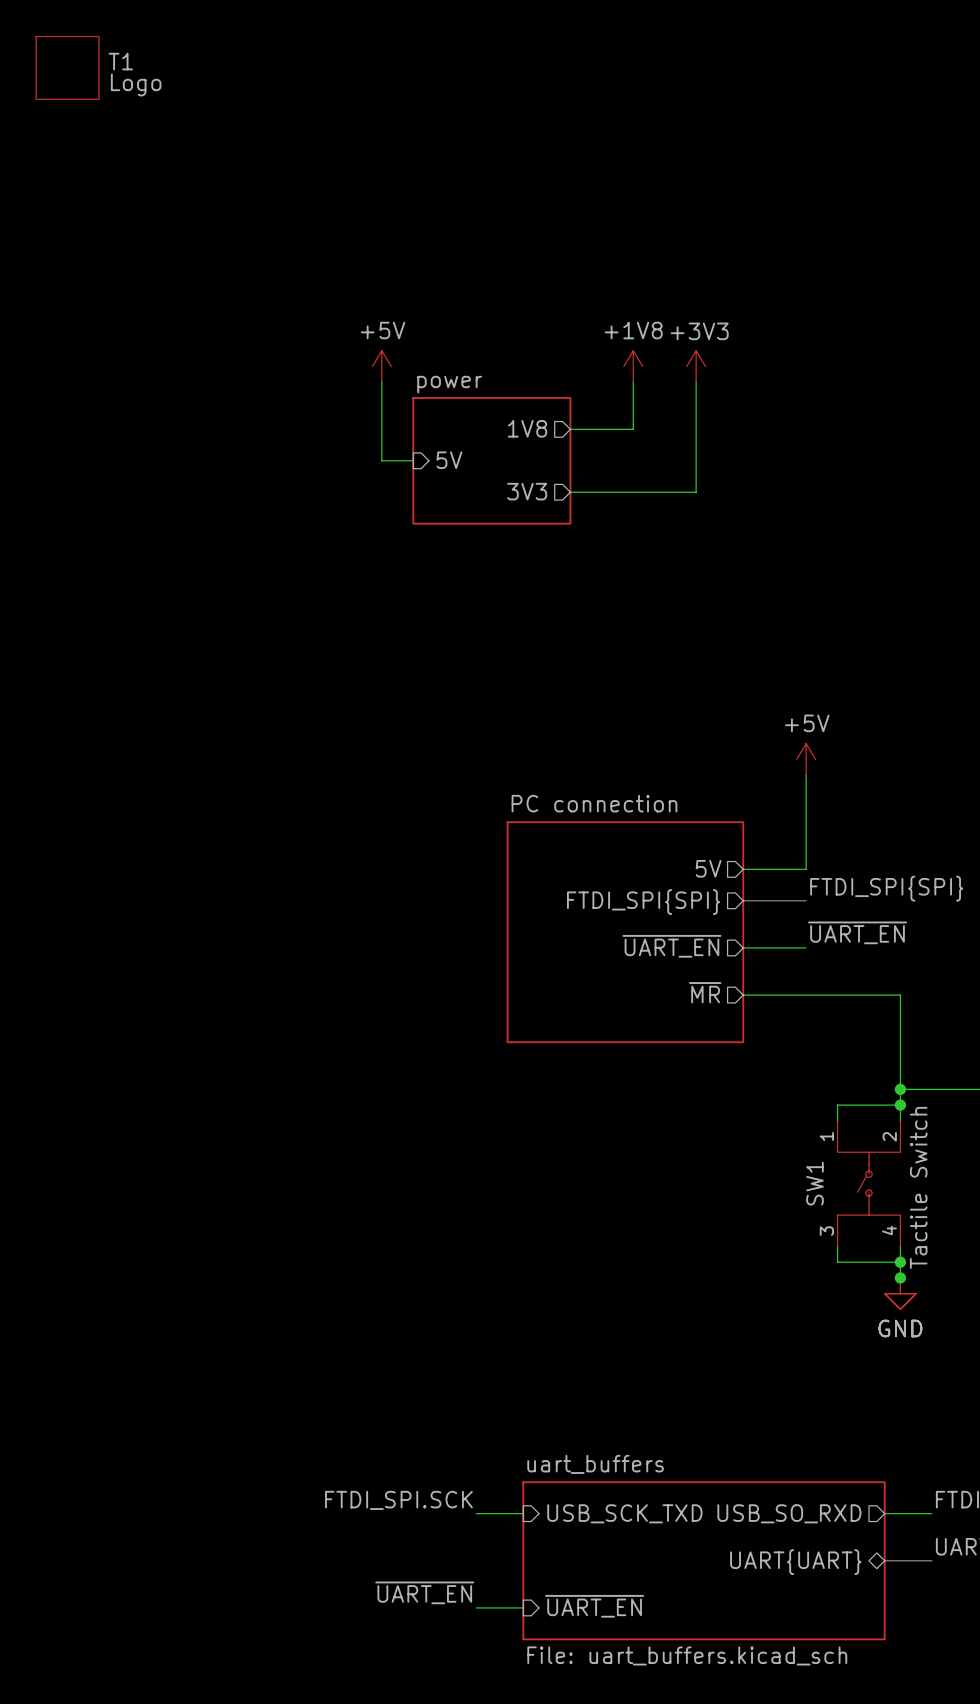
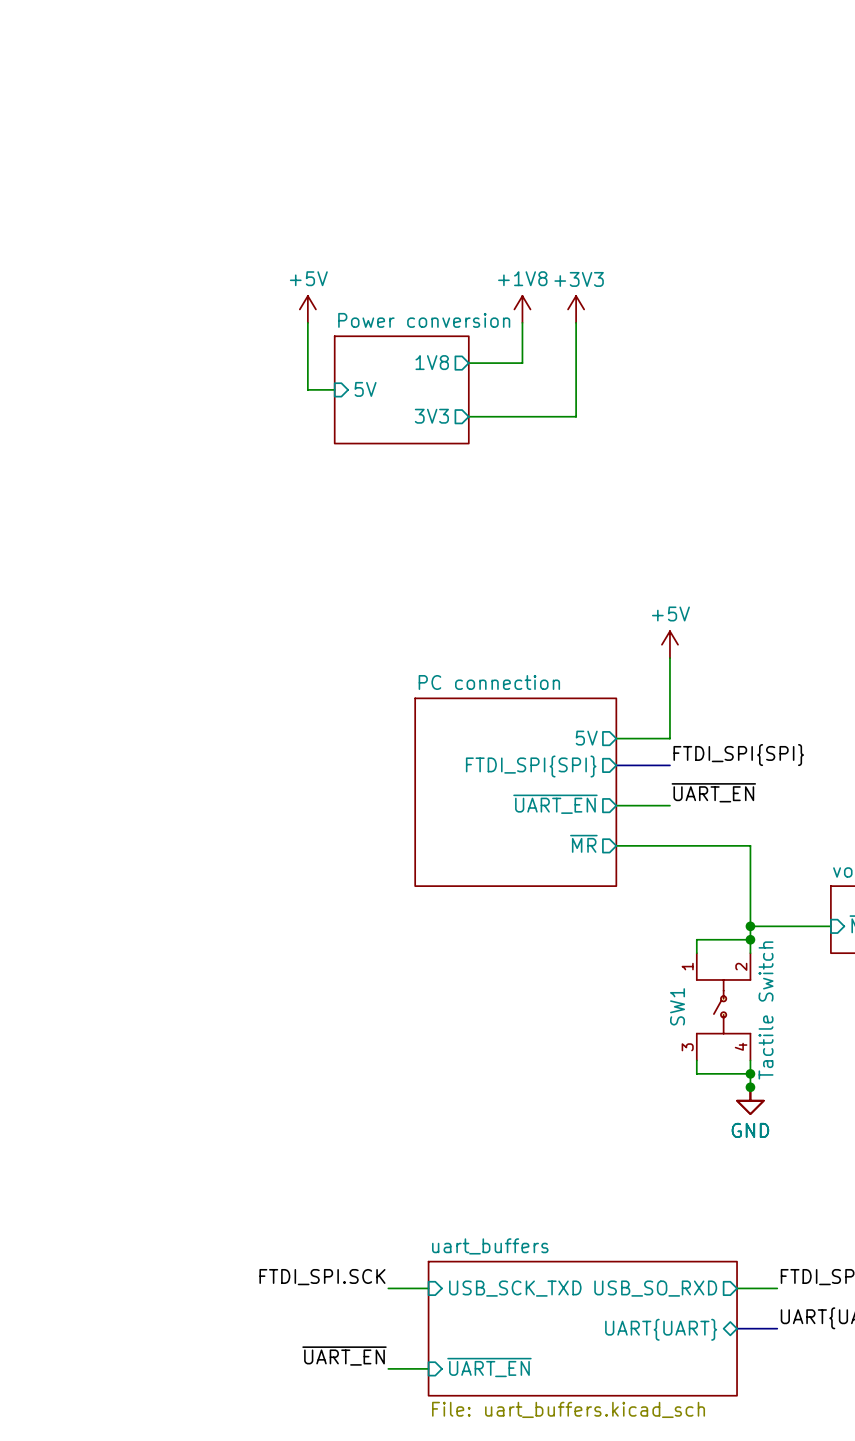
T1: Logo (67, 67) -> none
sheet power name: power (449, 384) -> Power conversion (424, 320)

